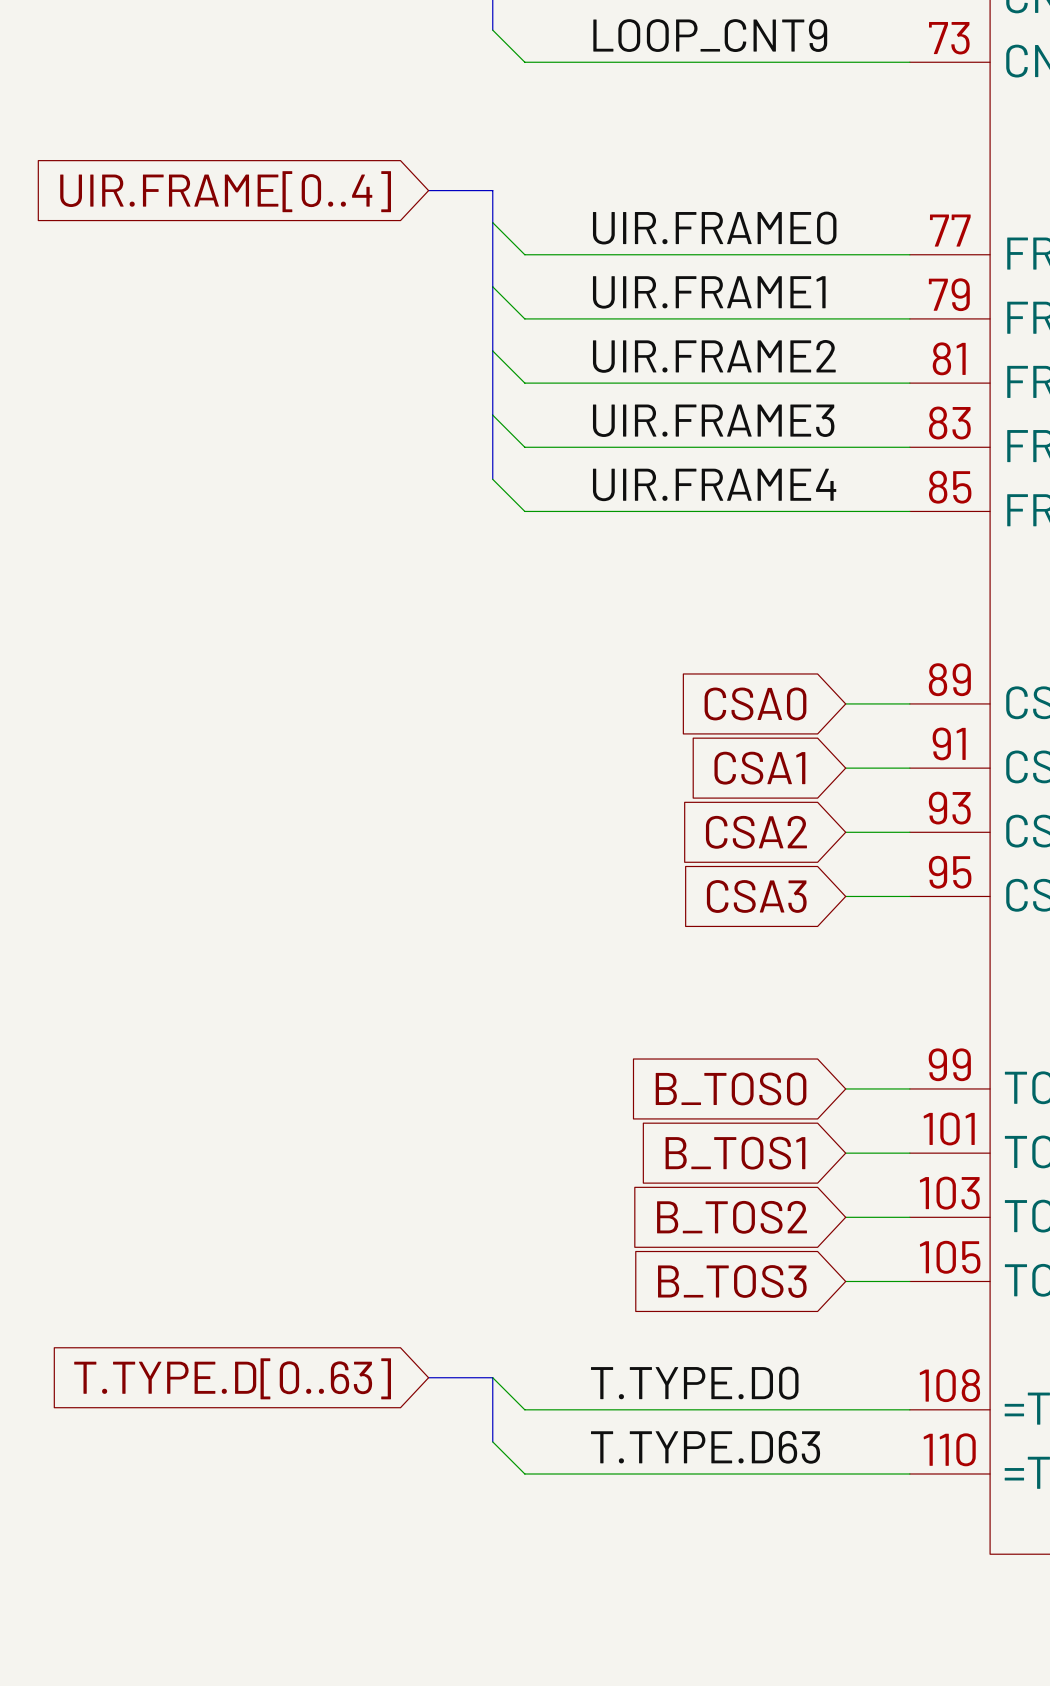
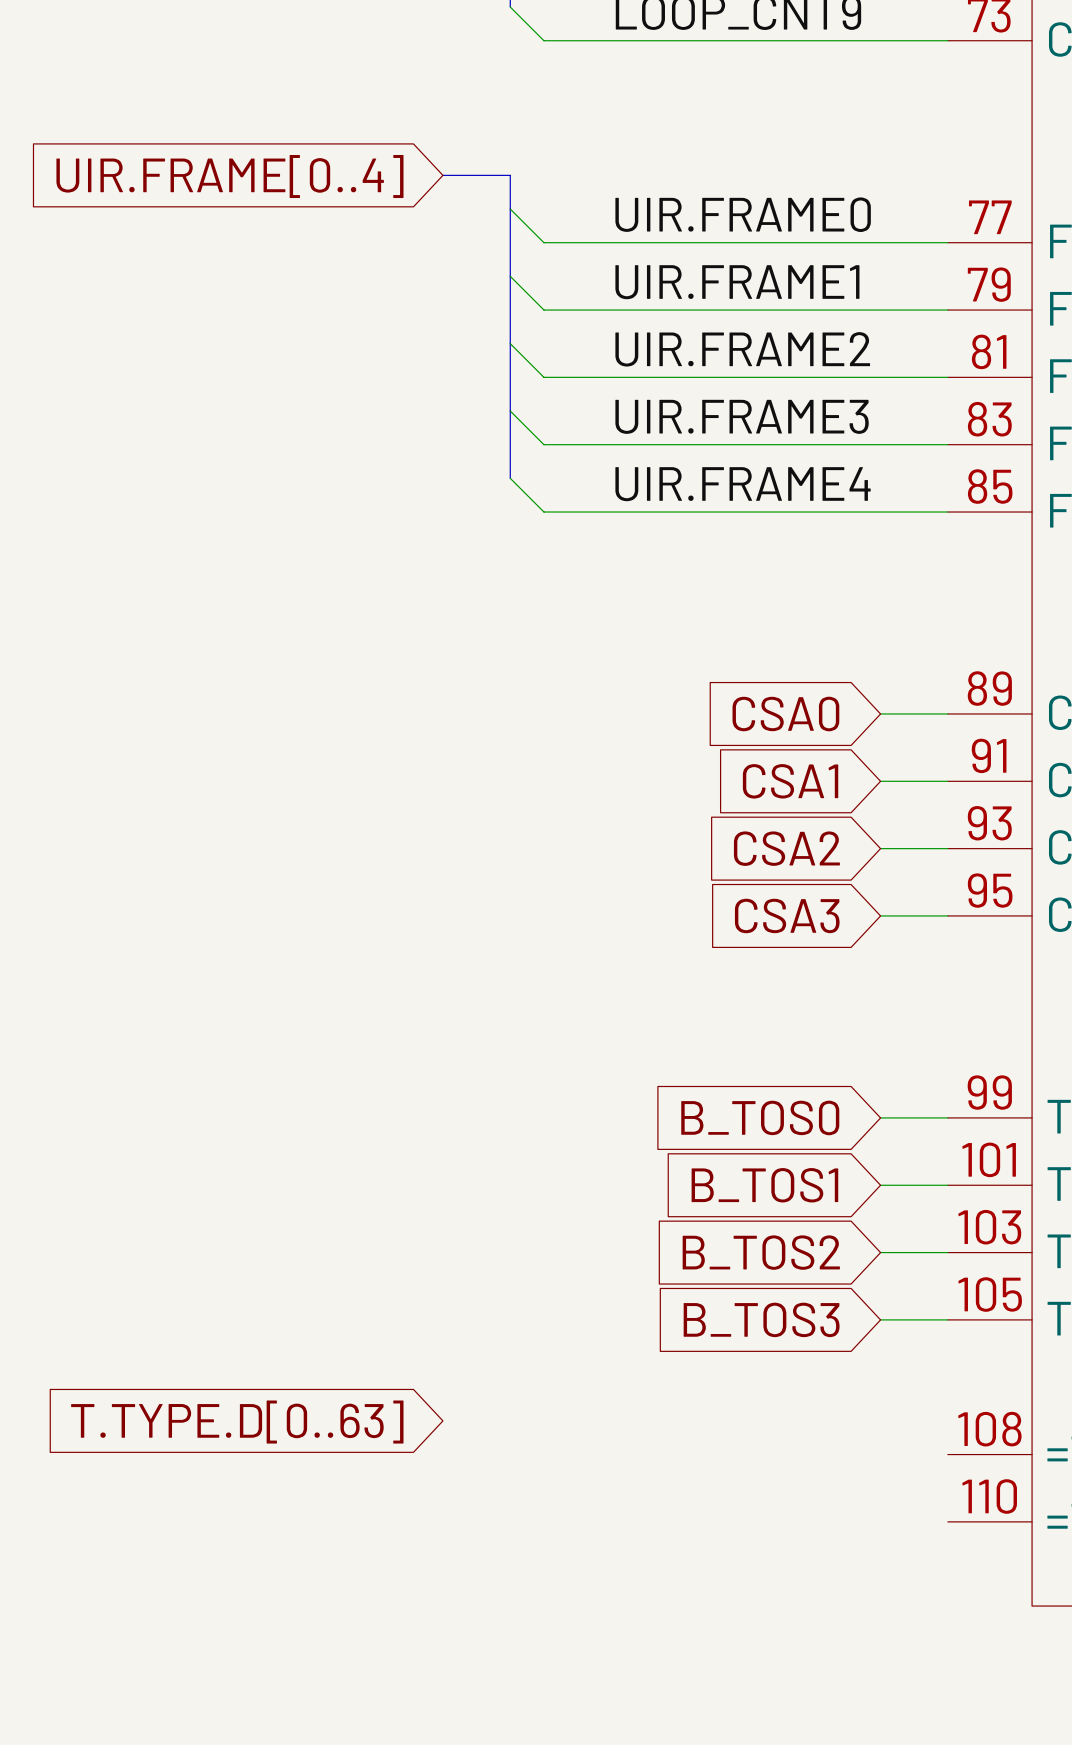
bus: (428, 1377) (492, 1377) (492, 1441) -> none
wire: (492, 1377) (524, 1409) (909, 1409) -> none
label: T.TYPE.D0 (694, 1383) -> none
wire: (492, 1441) (524, 1473) (909, 1473) -> none
label: T.TYPE.D63 (705, 1447) -> none

